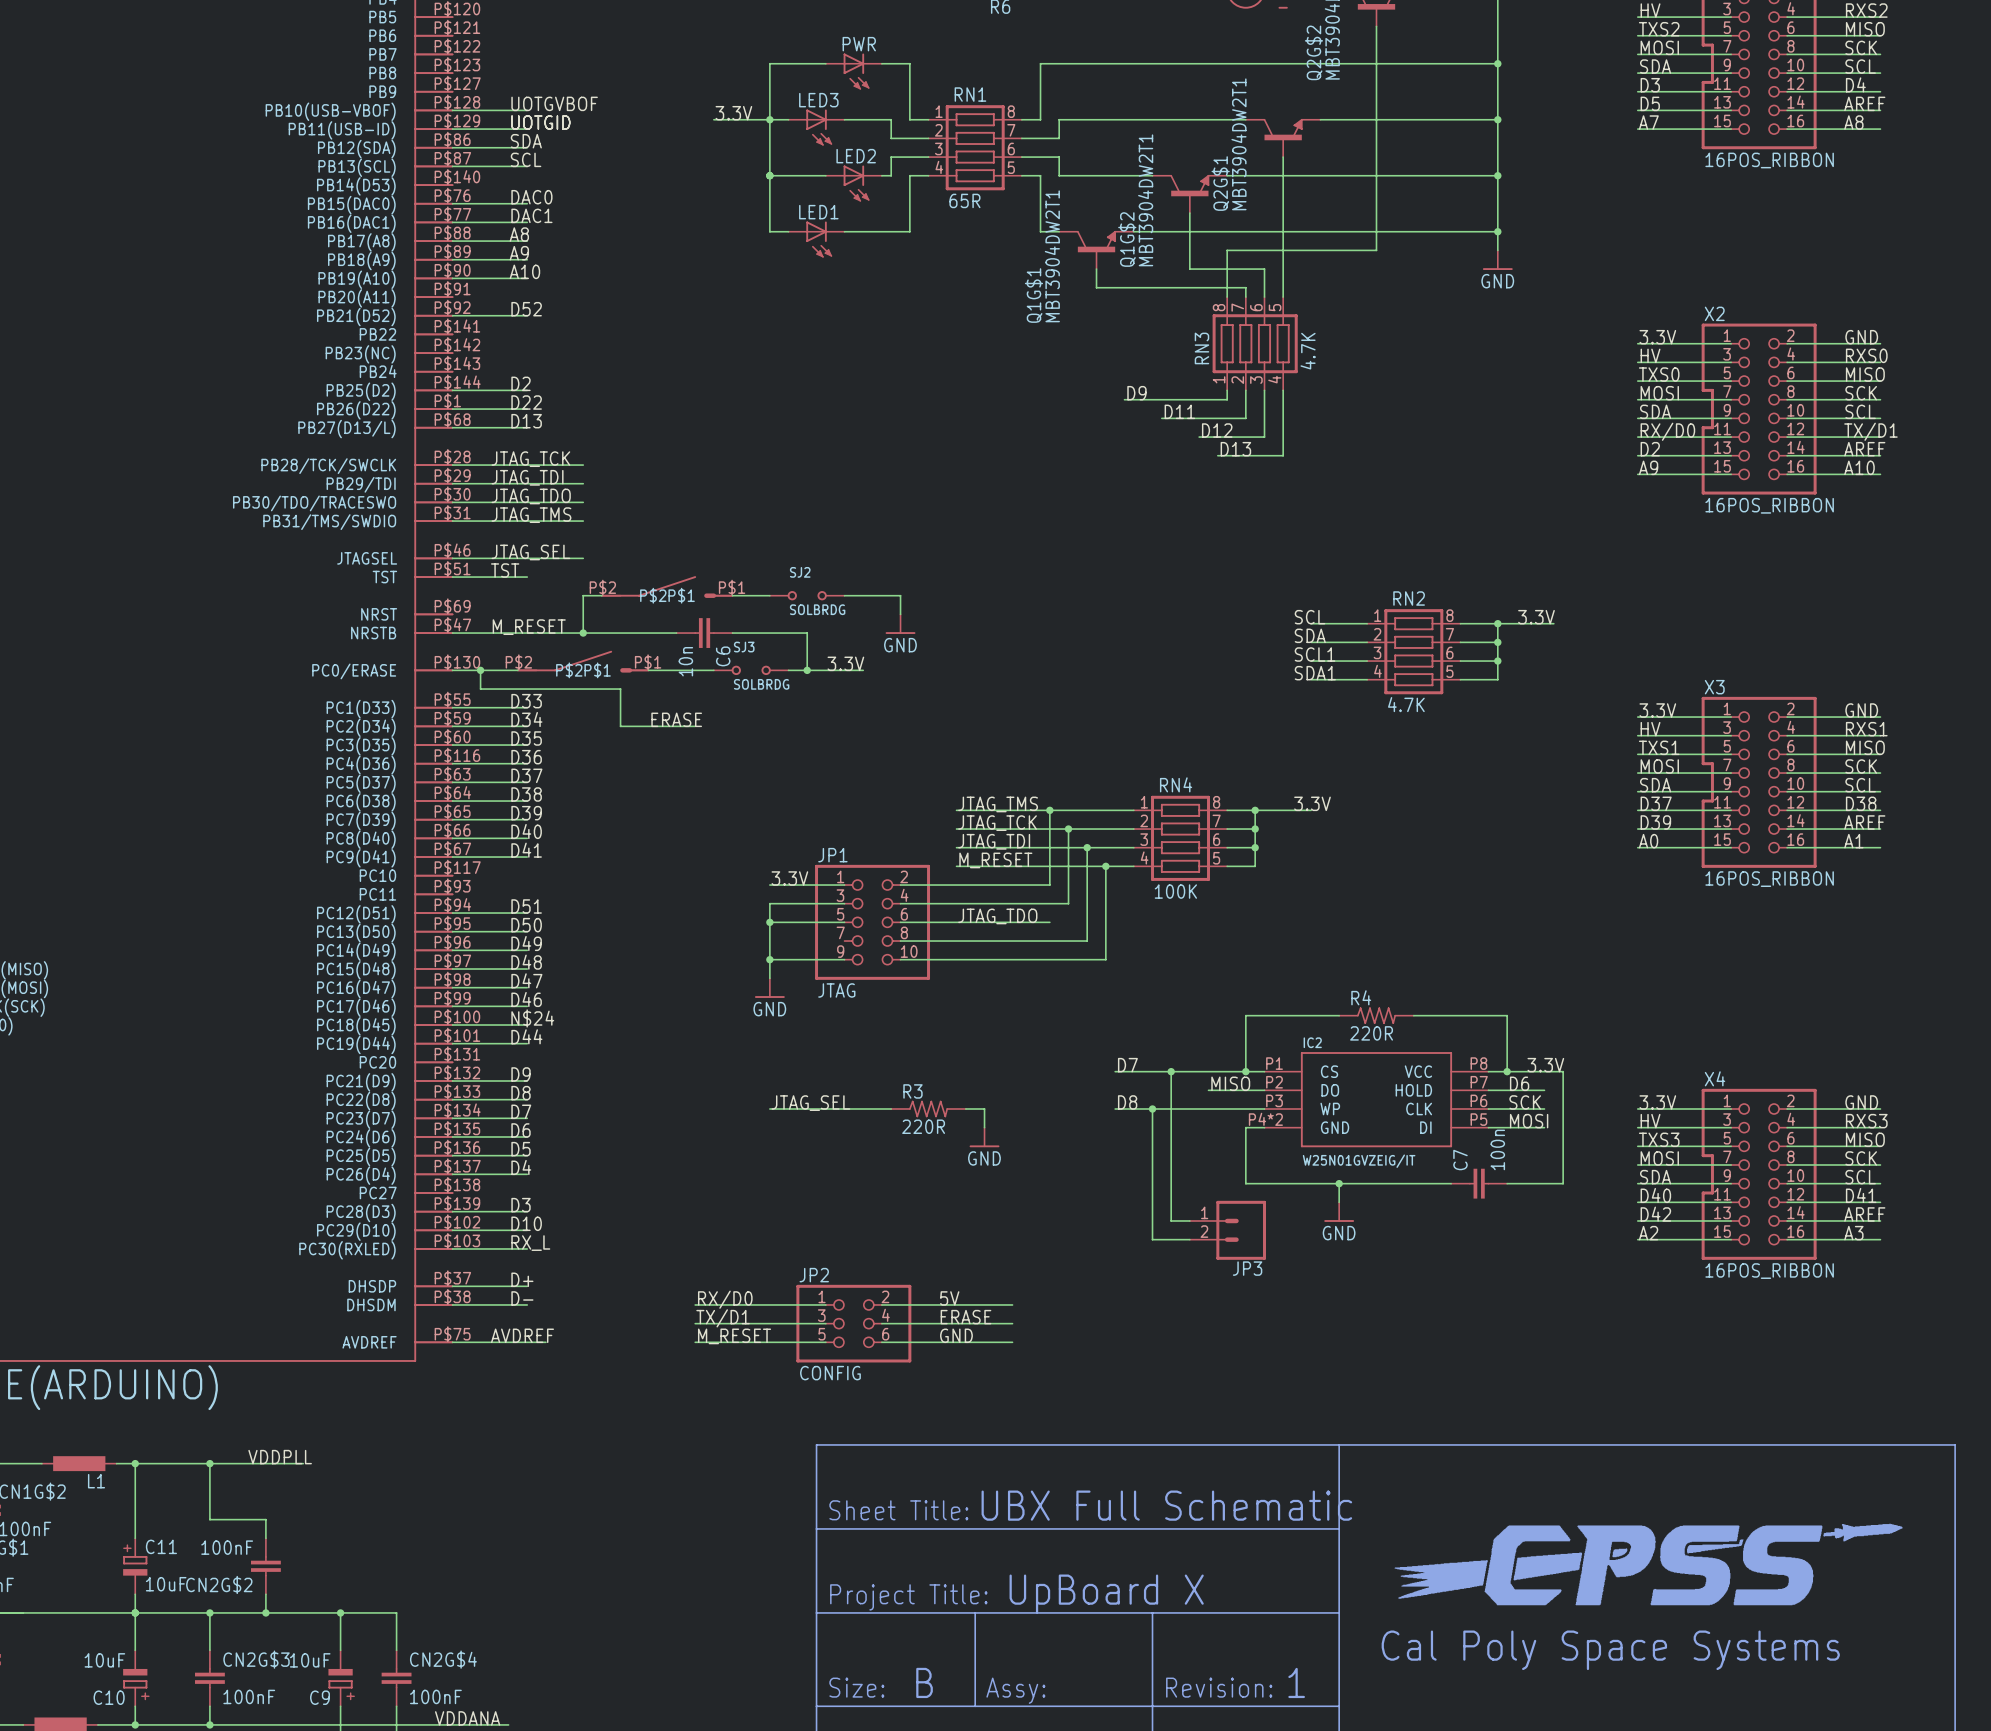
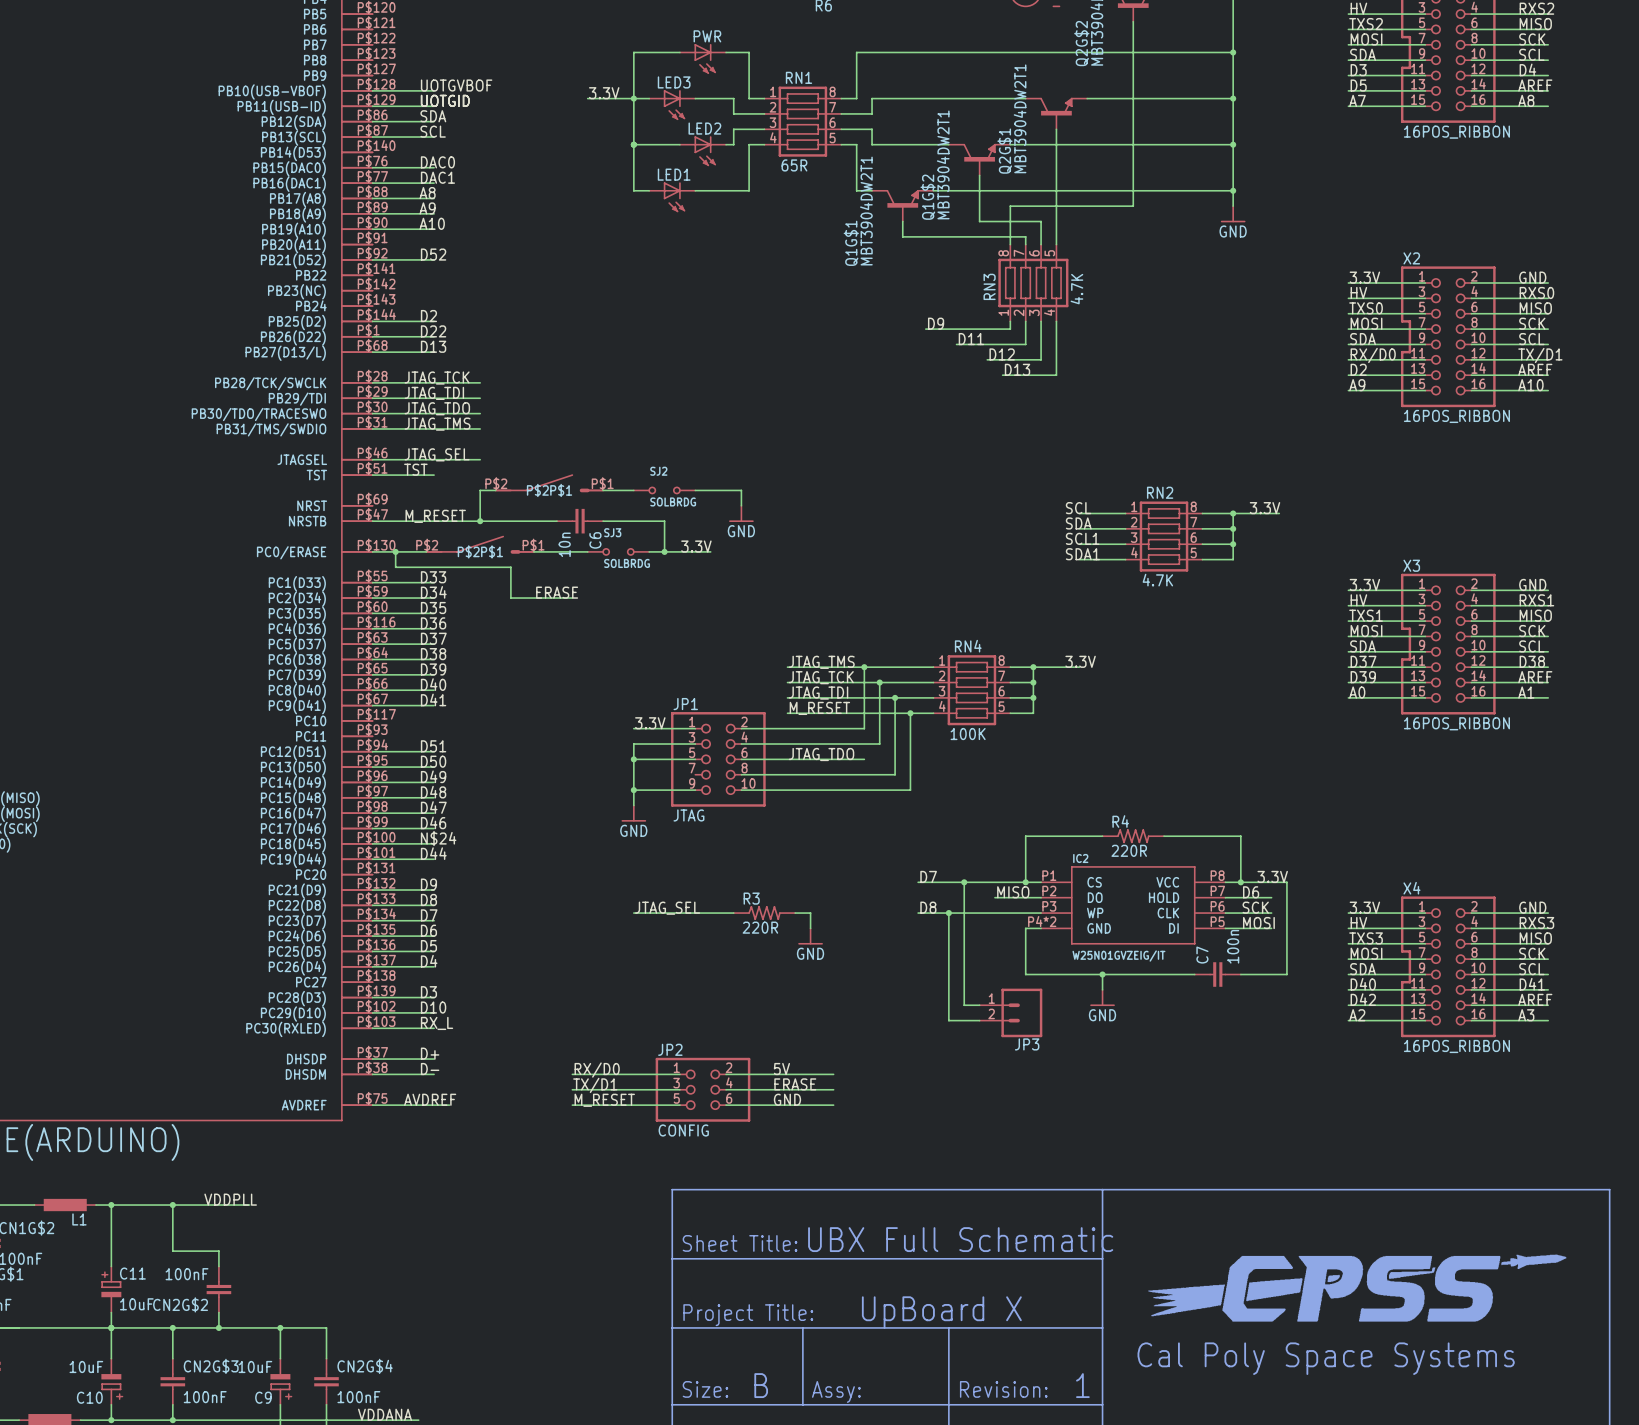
text position: UpBoard X (1106, 1594) -> UpBoard X (941, 1312)
text position: 1 (1296, 1682) -> 1 (1082, 1385)

